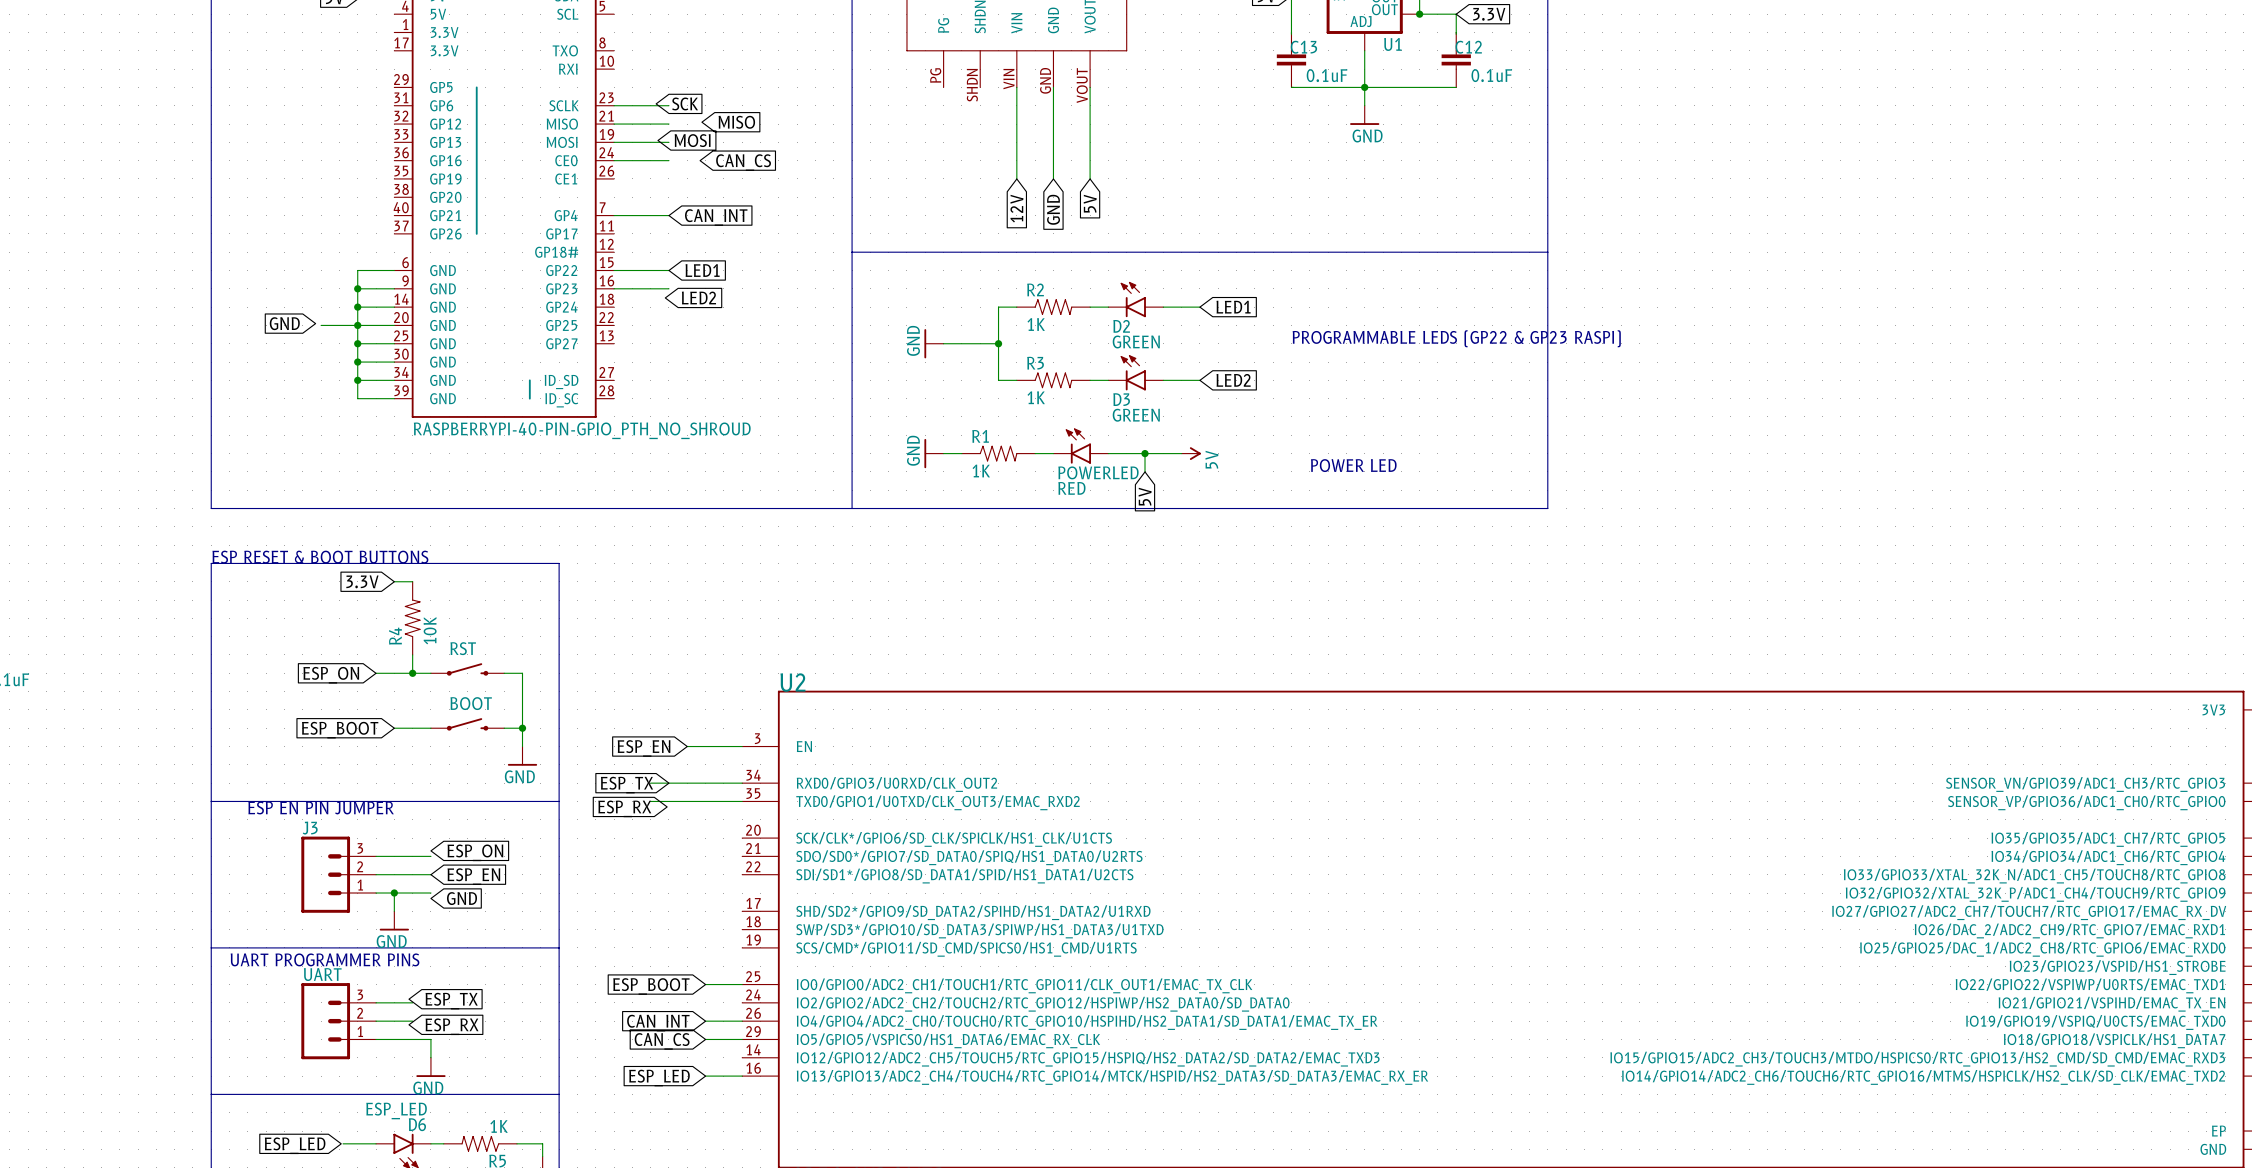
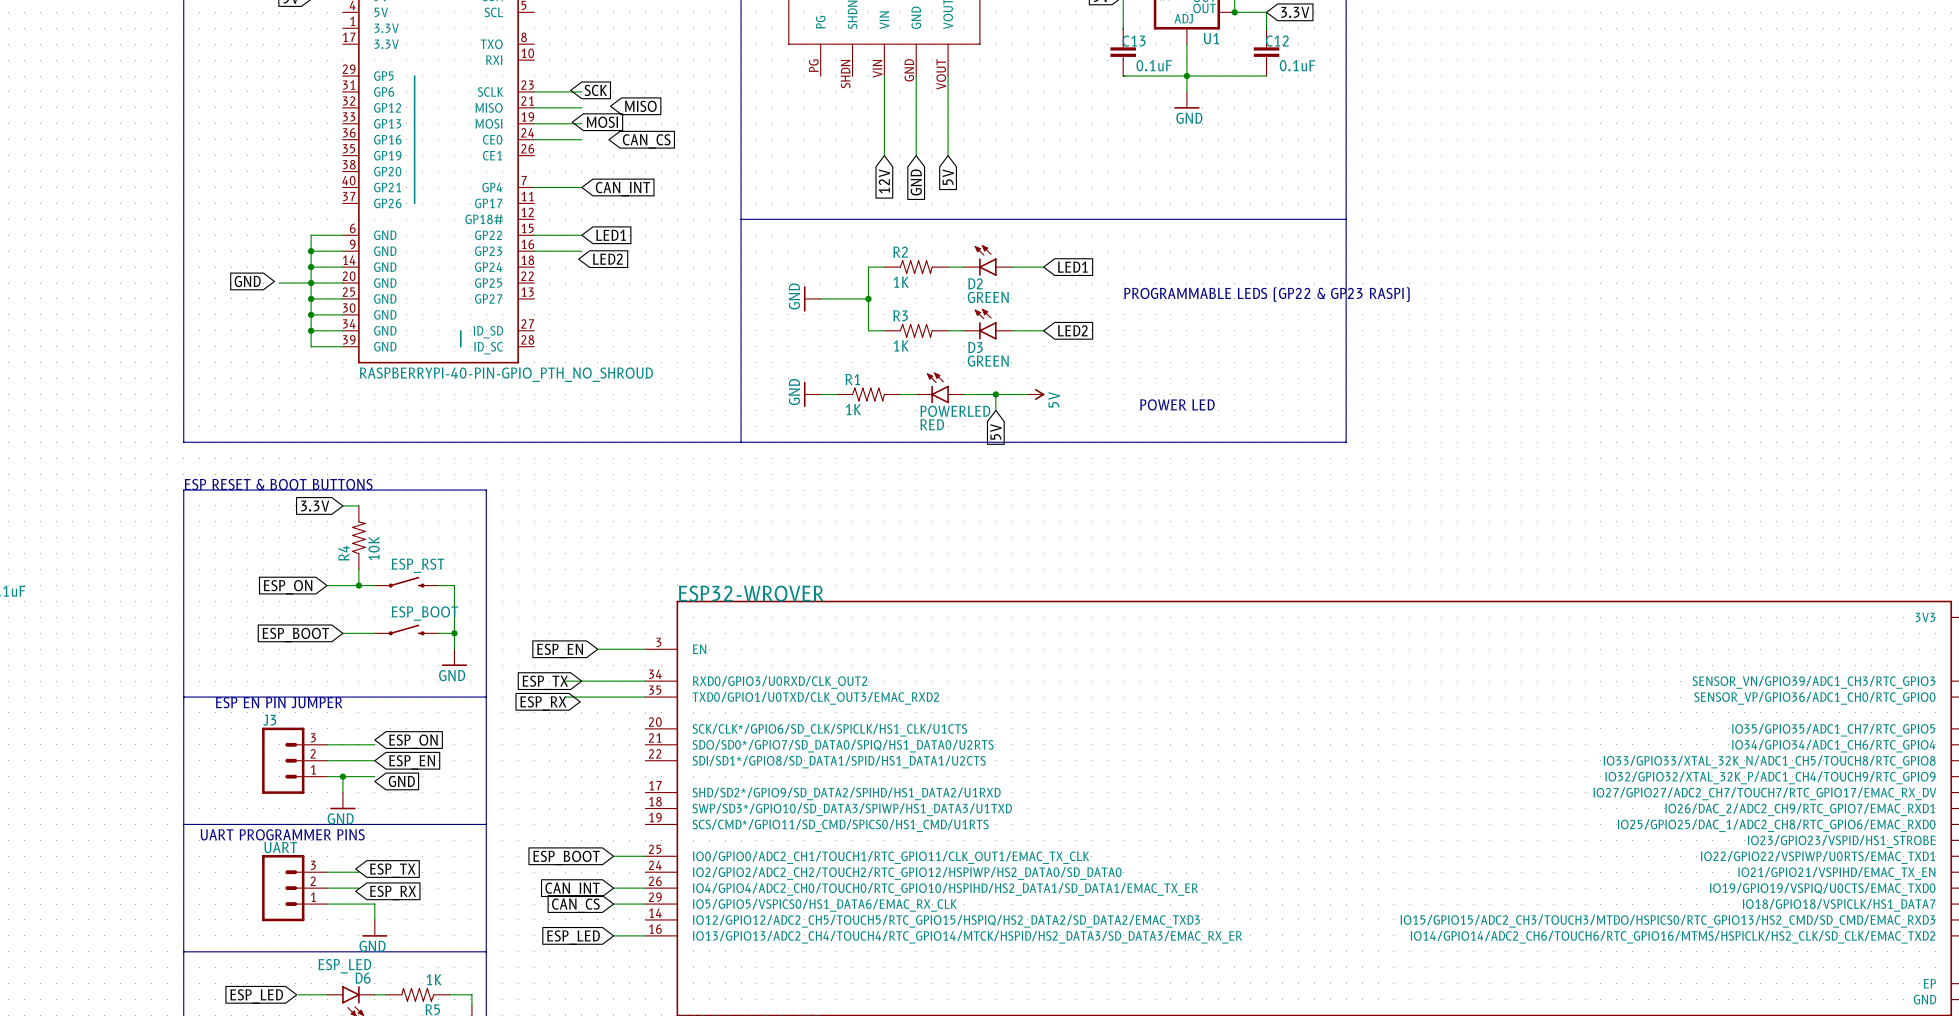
RST name: RST (463, 648) -> ESP_RST (418, 565)
U2 name: U2 (792, 682) -> ESP32-WROVER (751, 593)
BOOT name: BOOT (471, 703) -> ESP_BOOT (424, 613)

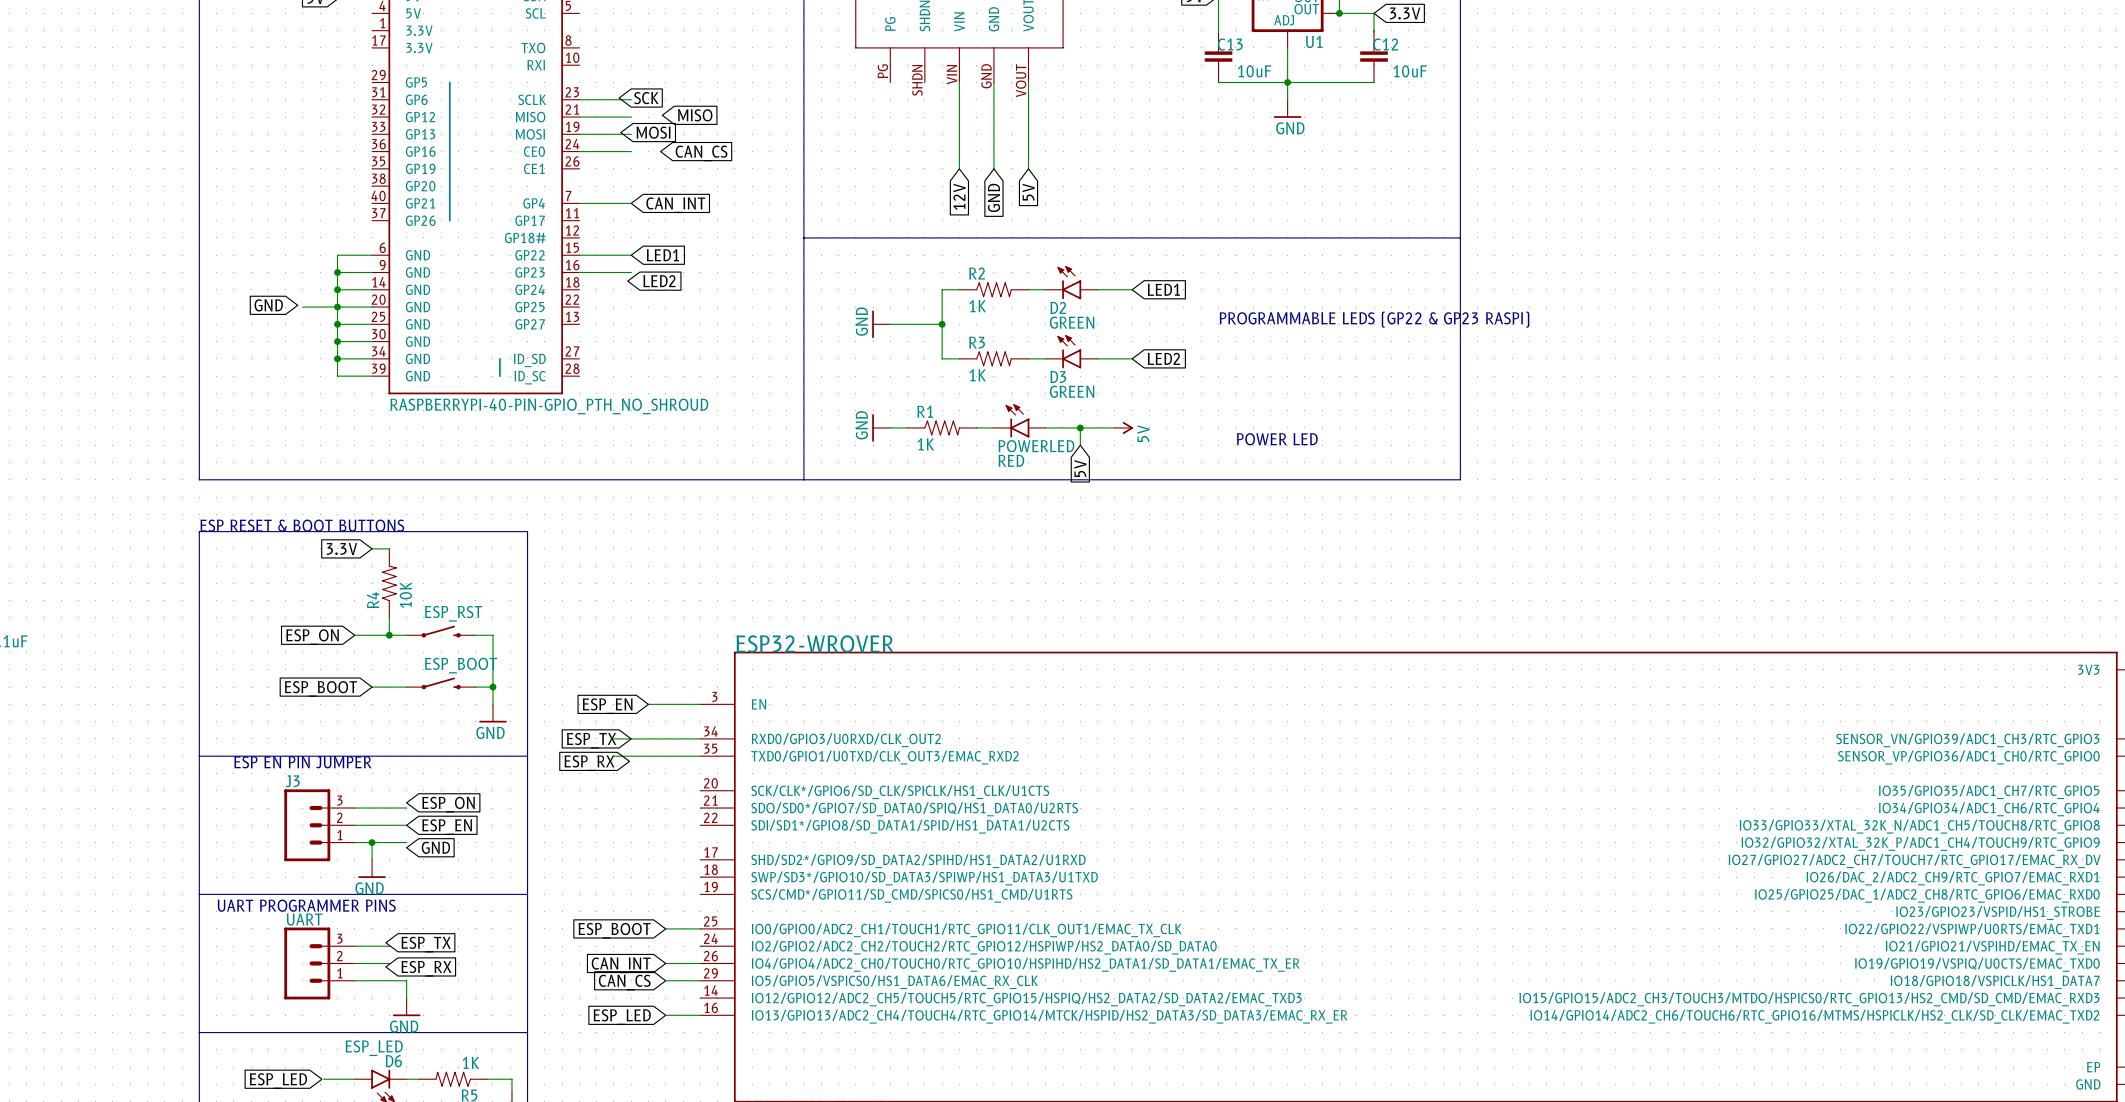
C13 value: 0.1uF (1154, 65) -> 10uF (1254, 71)
C12 value: 0.1uF (1297, 65) -> 10uF (1410, 71)

